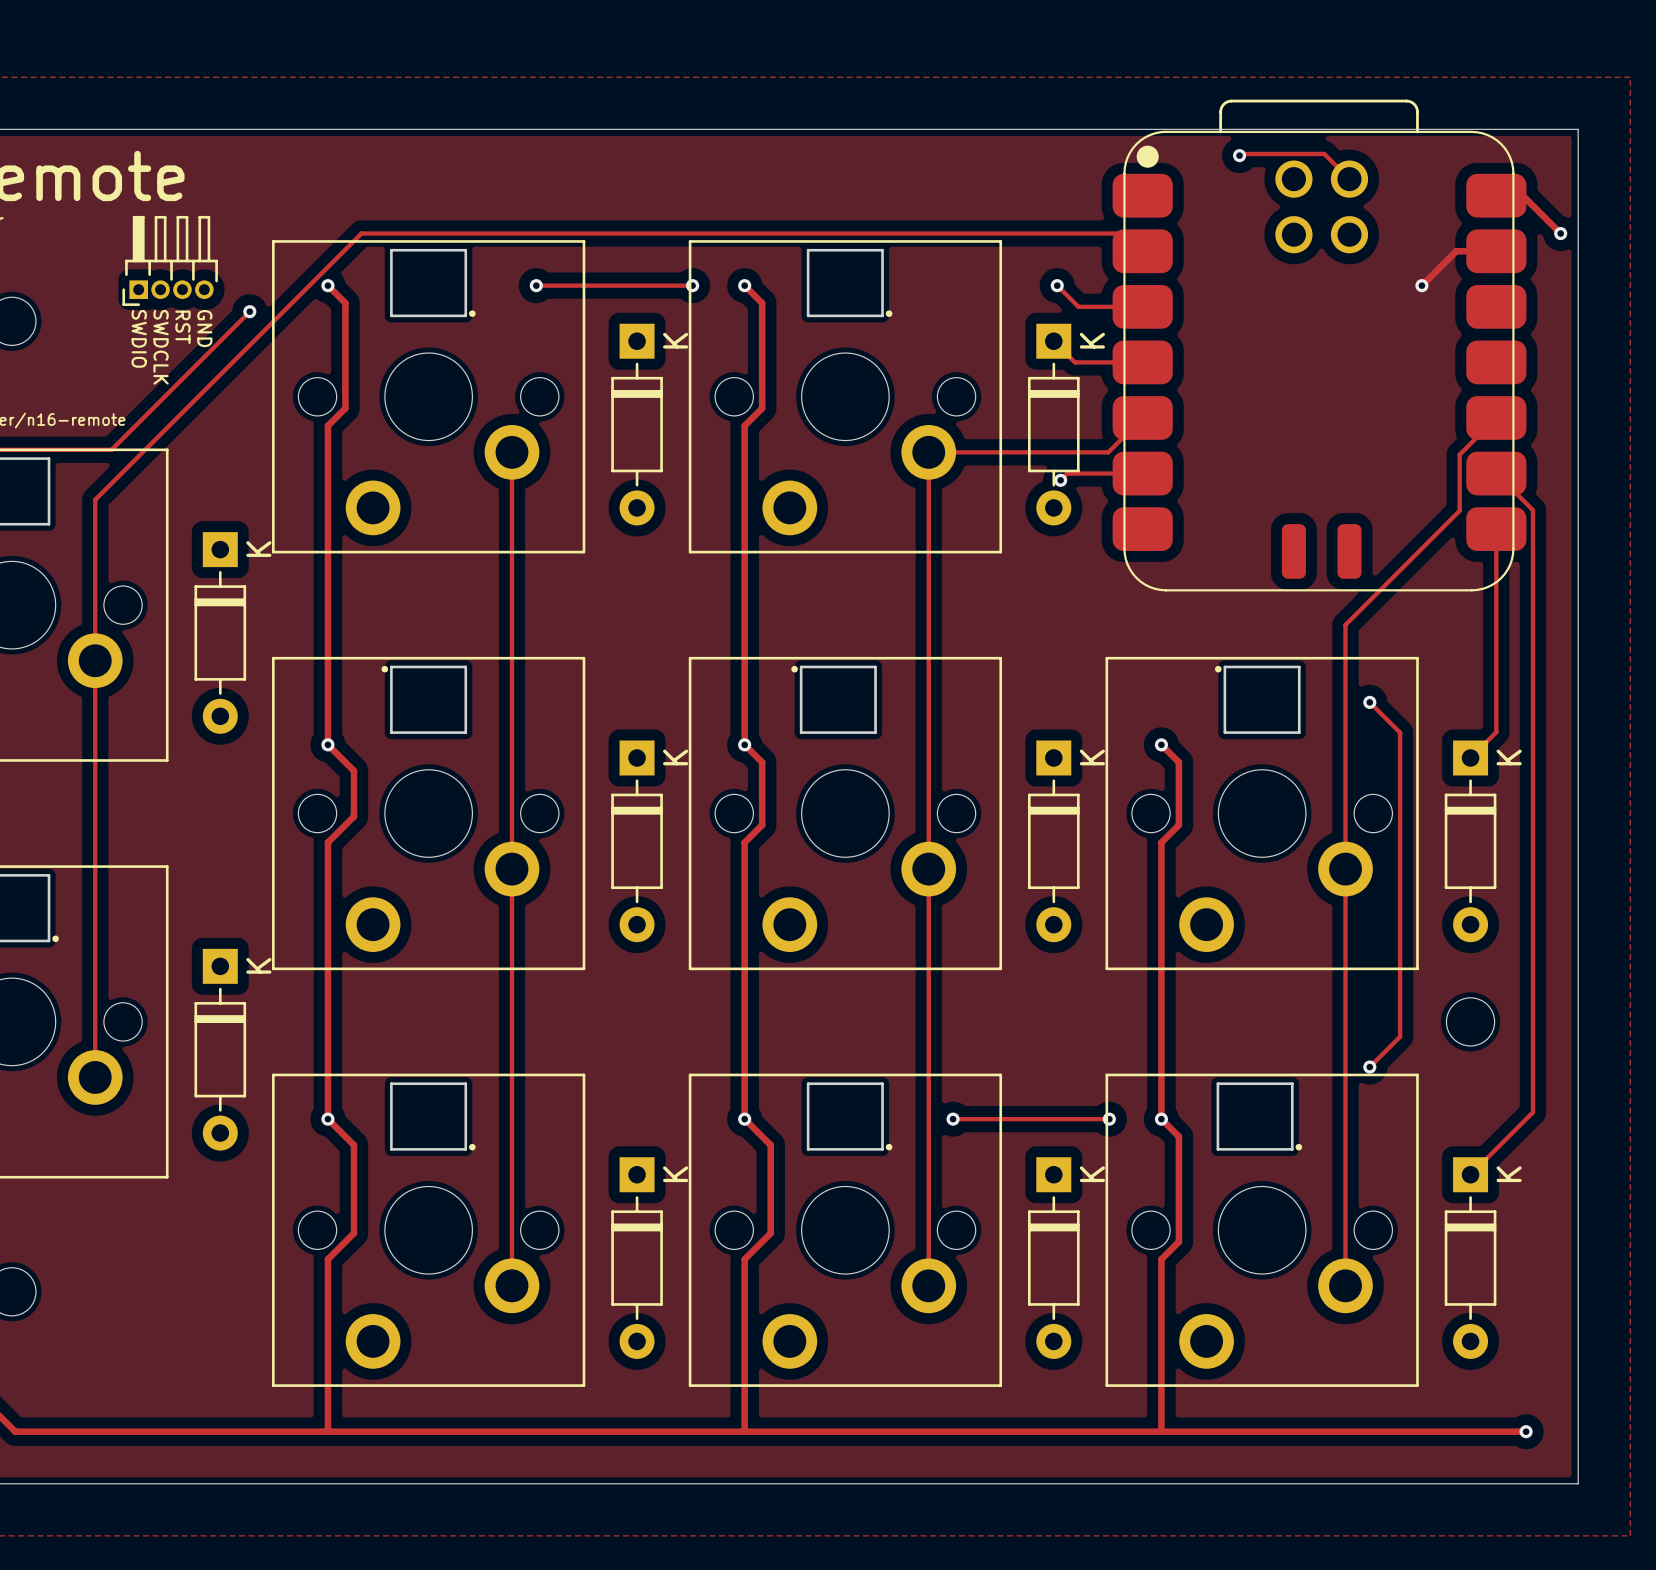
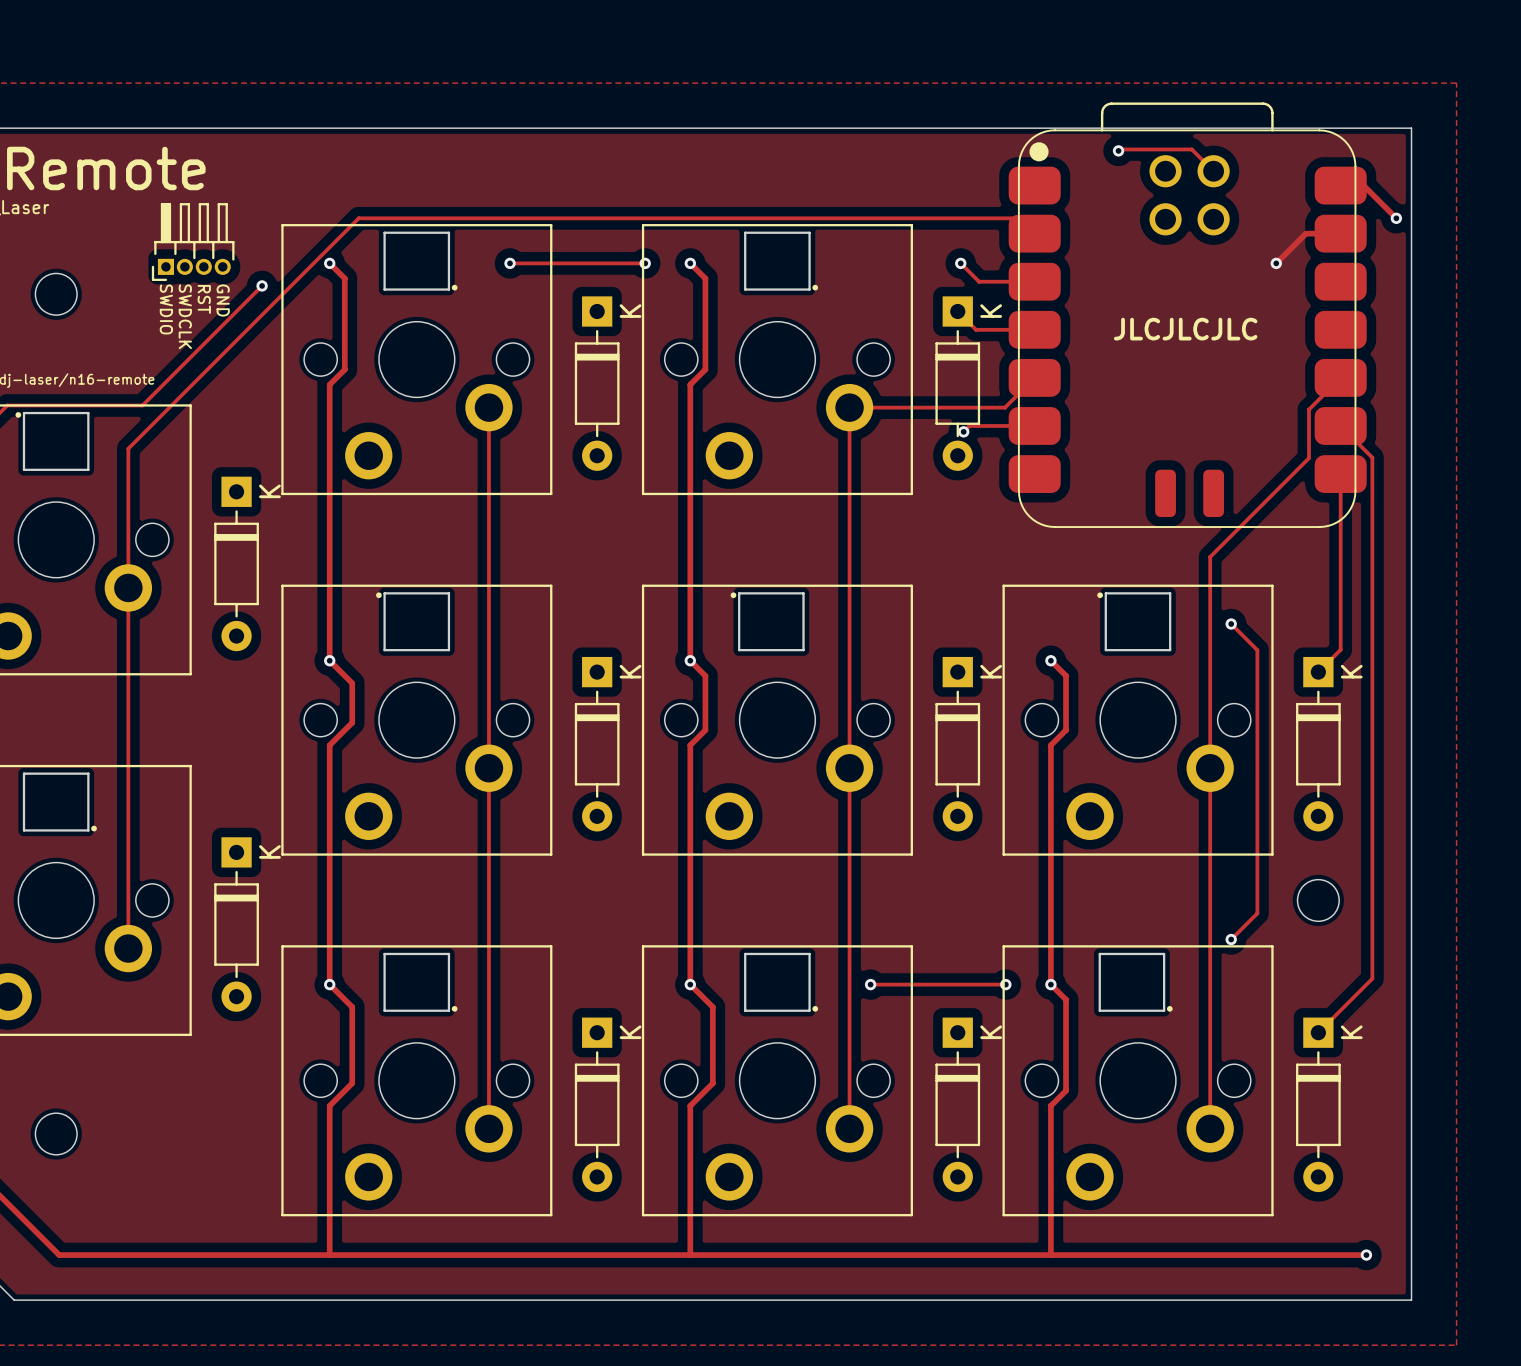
text: none -> JLCJLCJLC (1185, 329)

